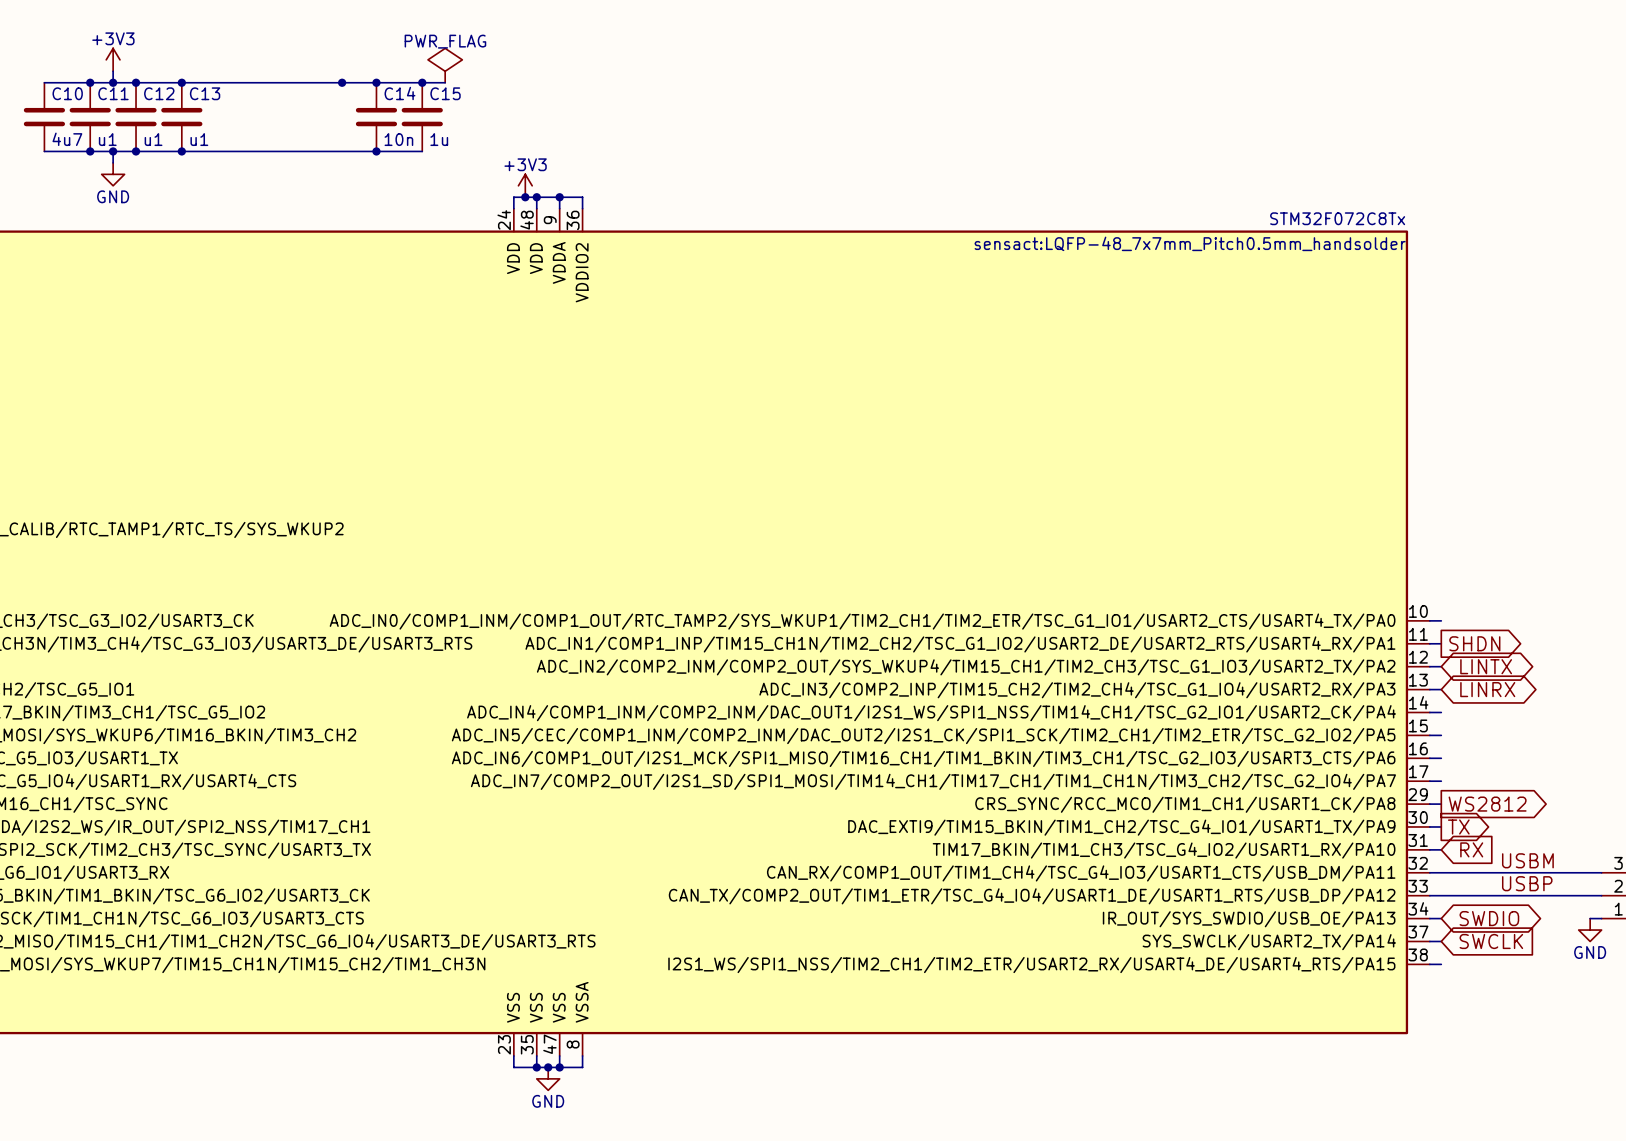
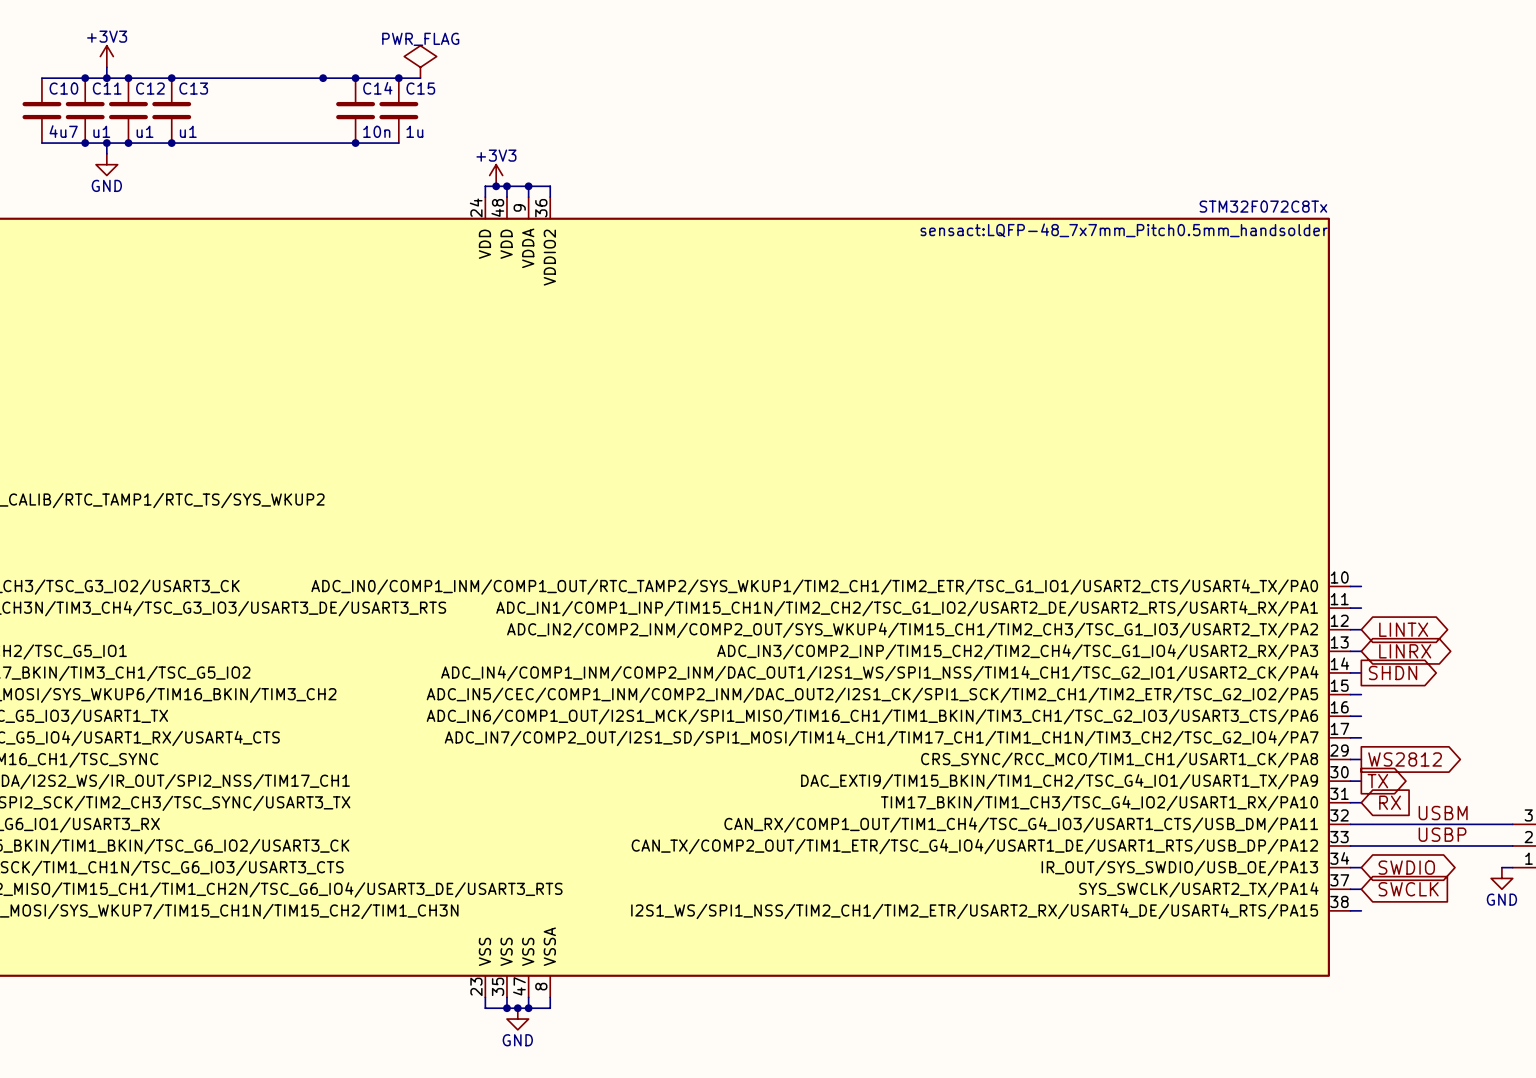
global label position: SHDN (1474, 643) -> SHDN (1393, 672)

